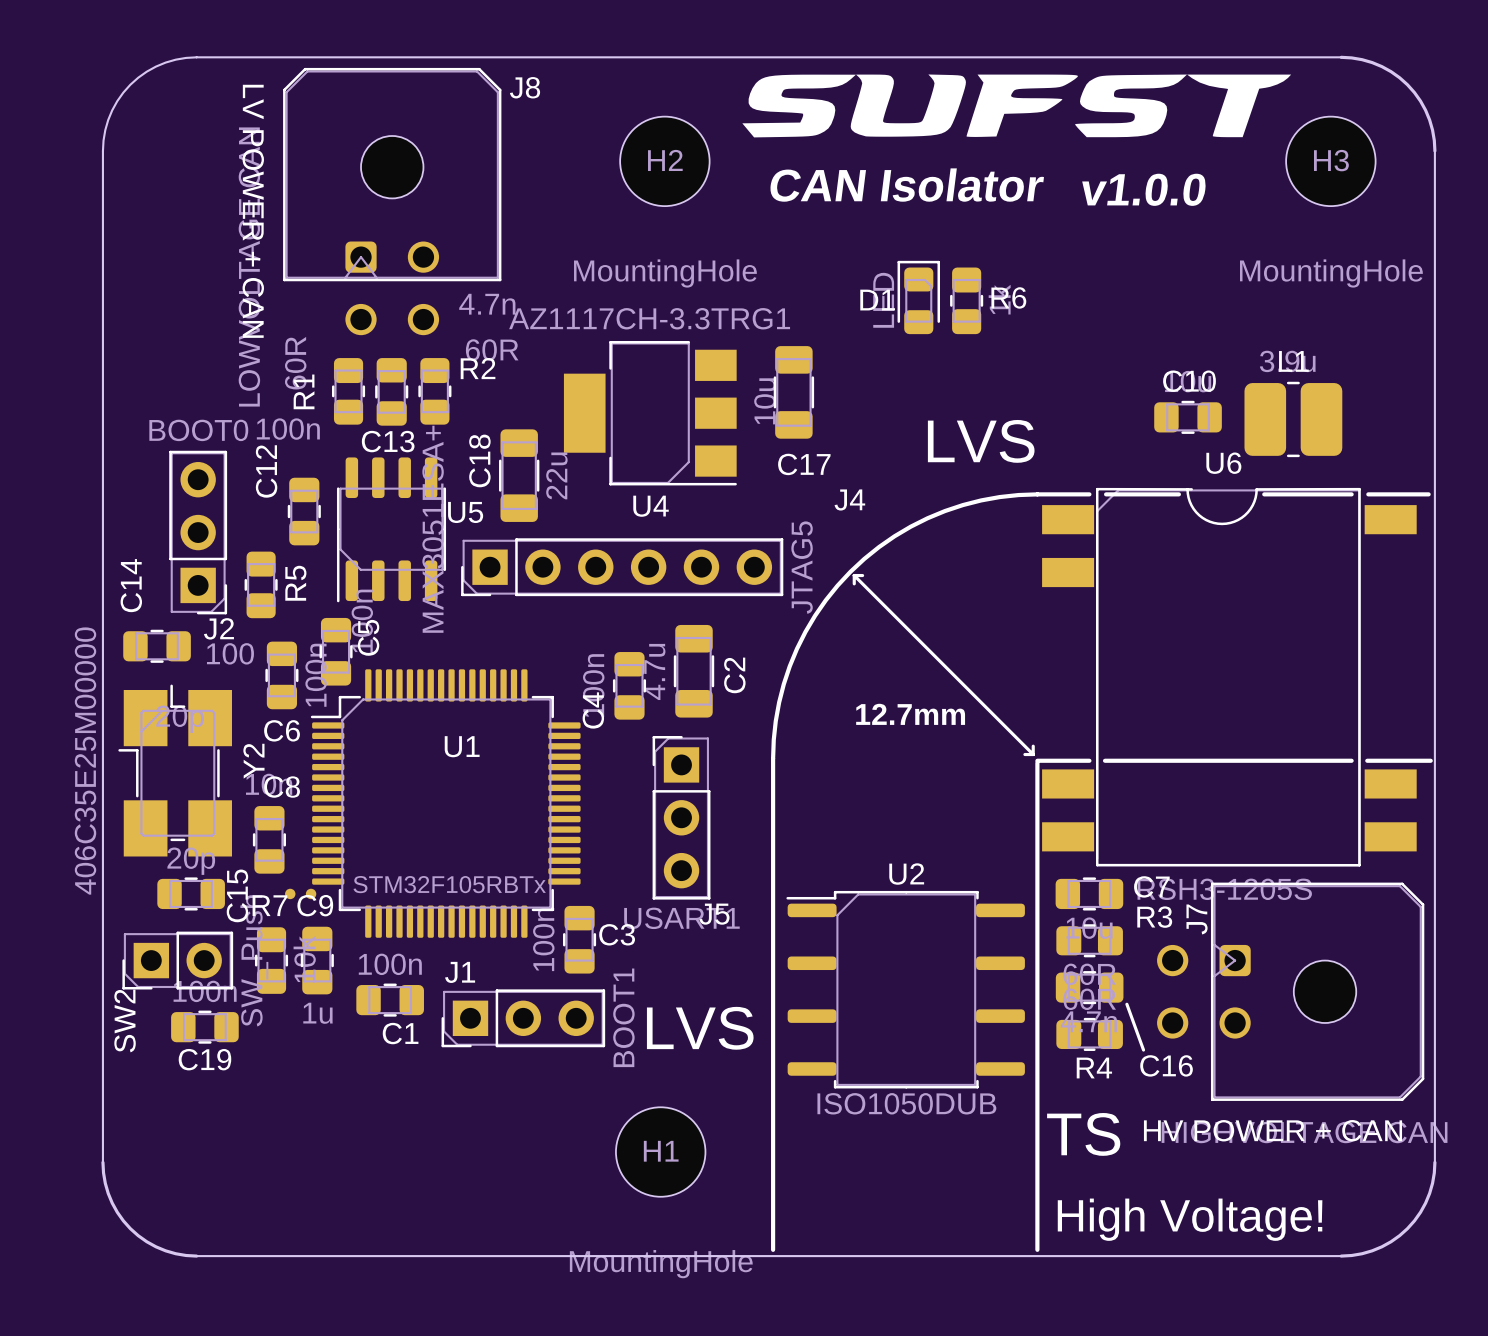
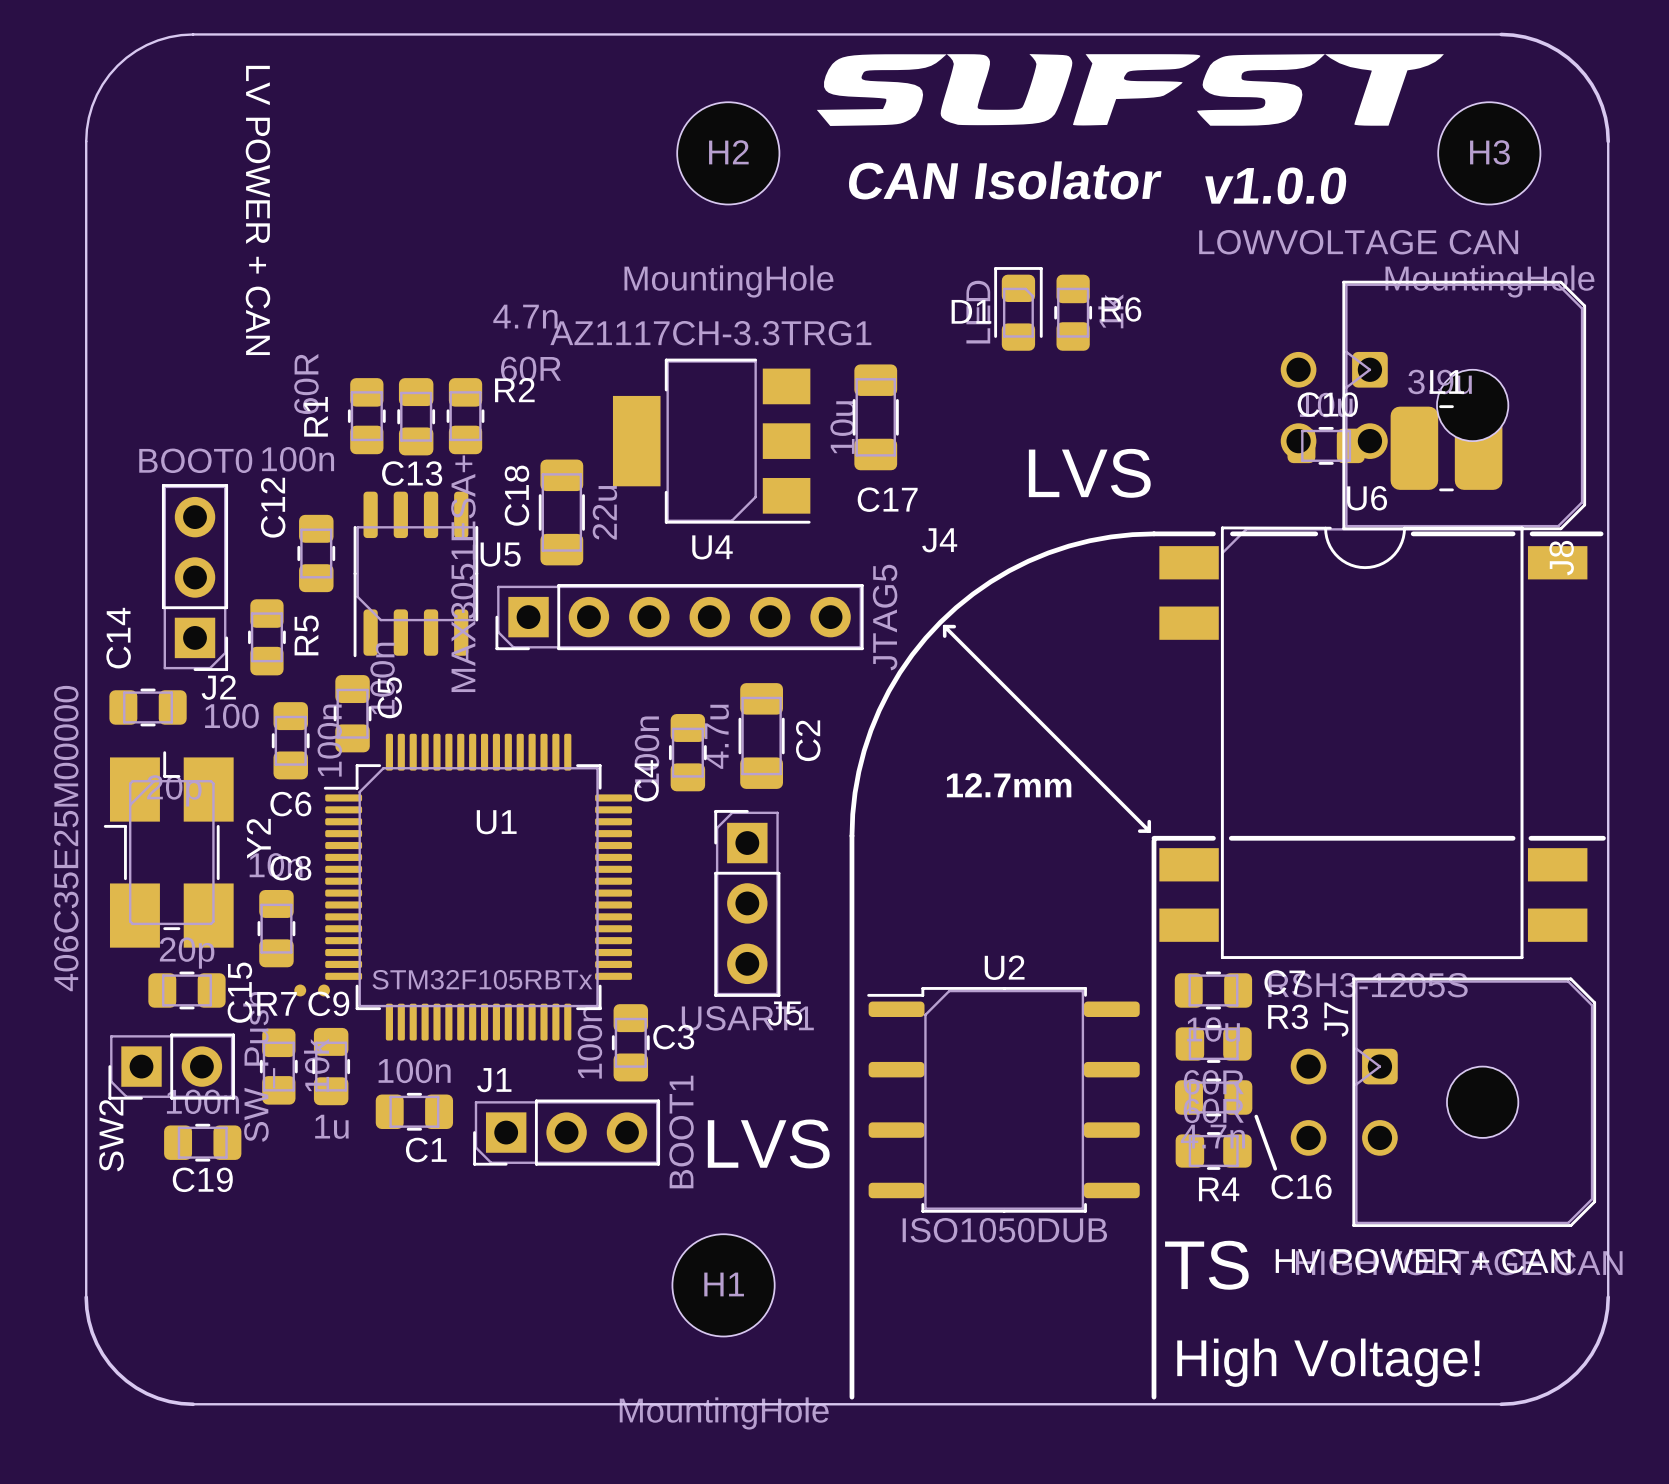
J8 rotation: 0° (392, 201) -> 90° clockwise (1433, 405)
J8 position: (392, 201) -> (1433, 405)

